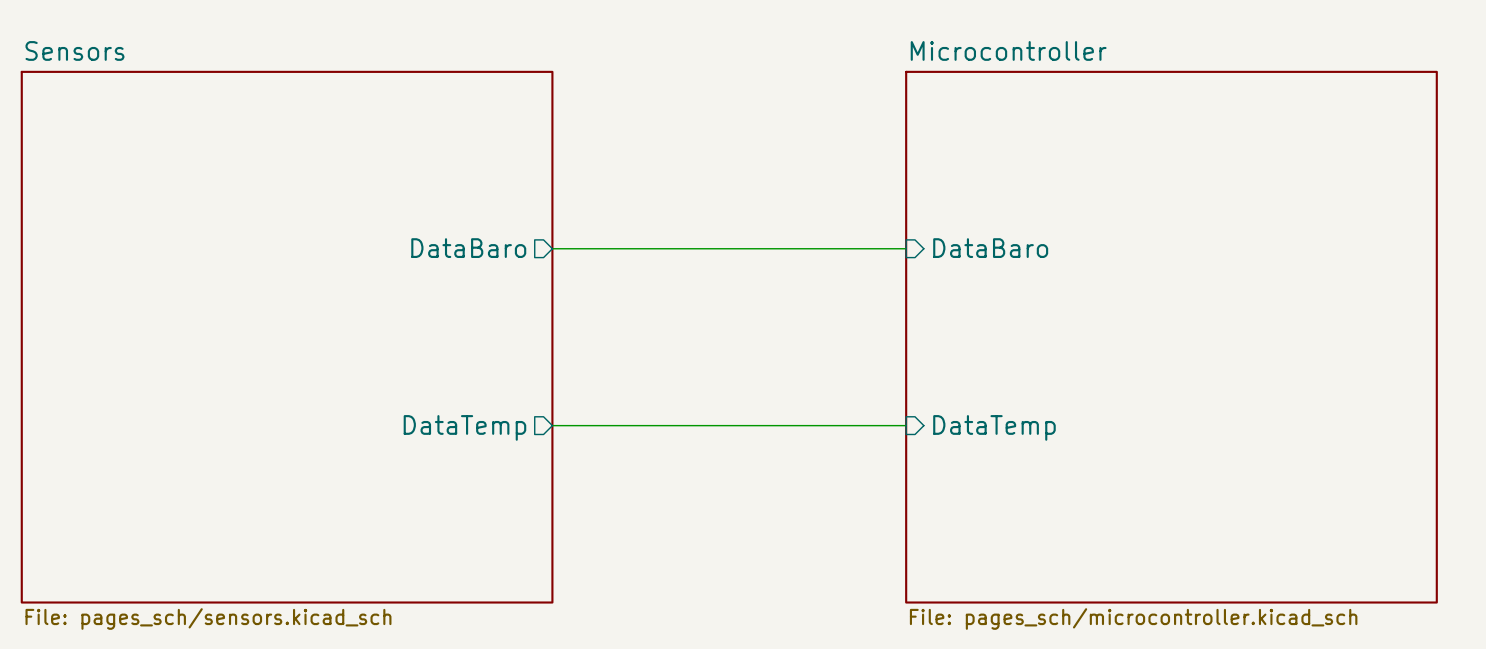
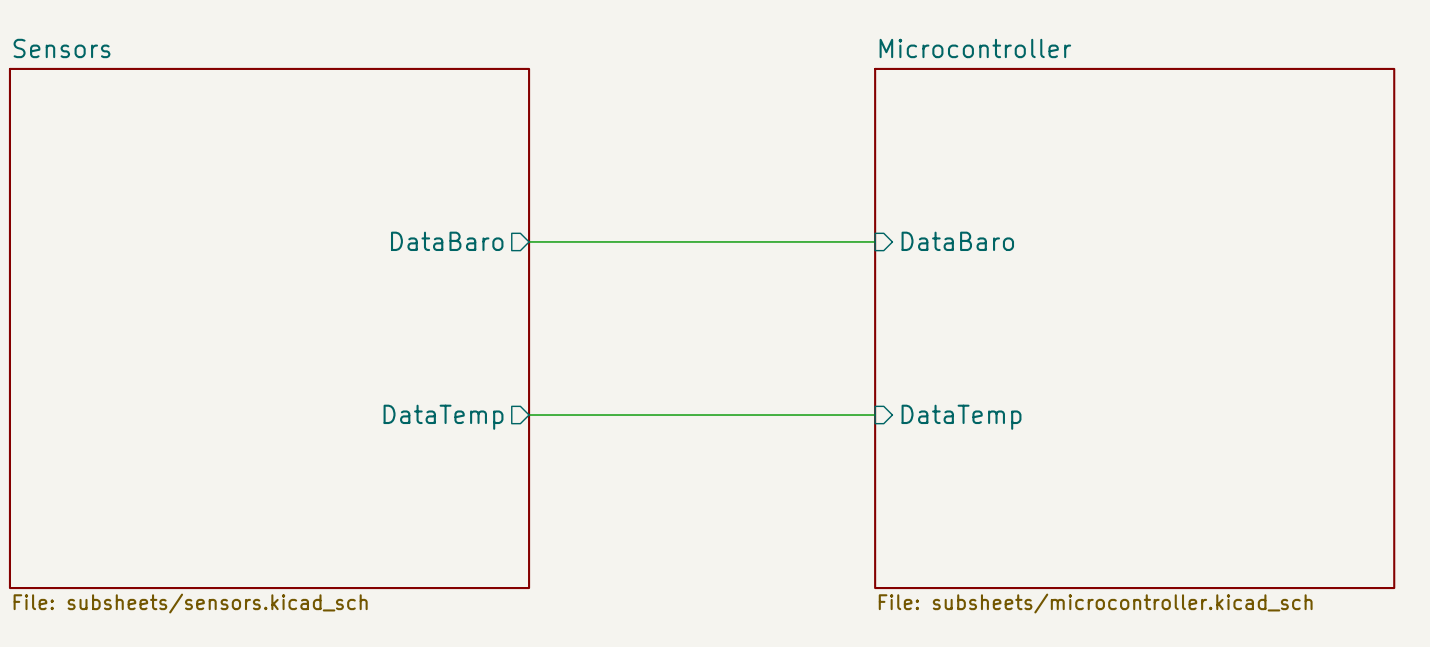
sheet Sensors value: File: pages_sch/sensors.kicad_sch (208, 619) -> File: subsheets/sensors.kicad_sch (190, 603)
sheet Microcontroller value: File: pages_sch/microcontroller.kicad_sch (1133, 619) -> File: subsheets/microcontroller.kicad_sch (1095, 603)

